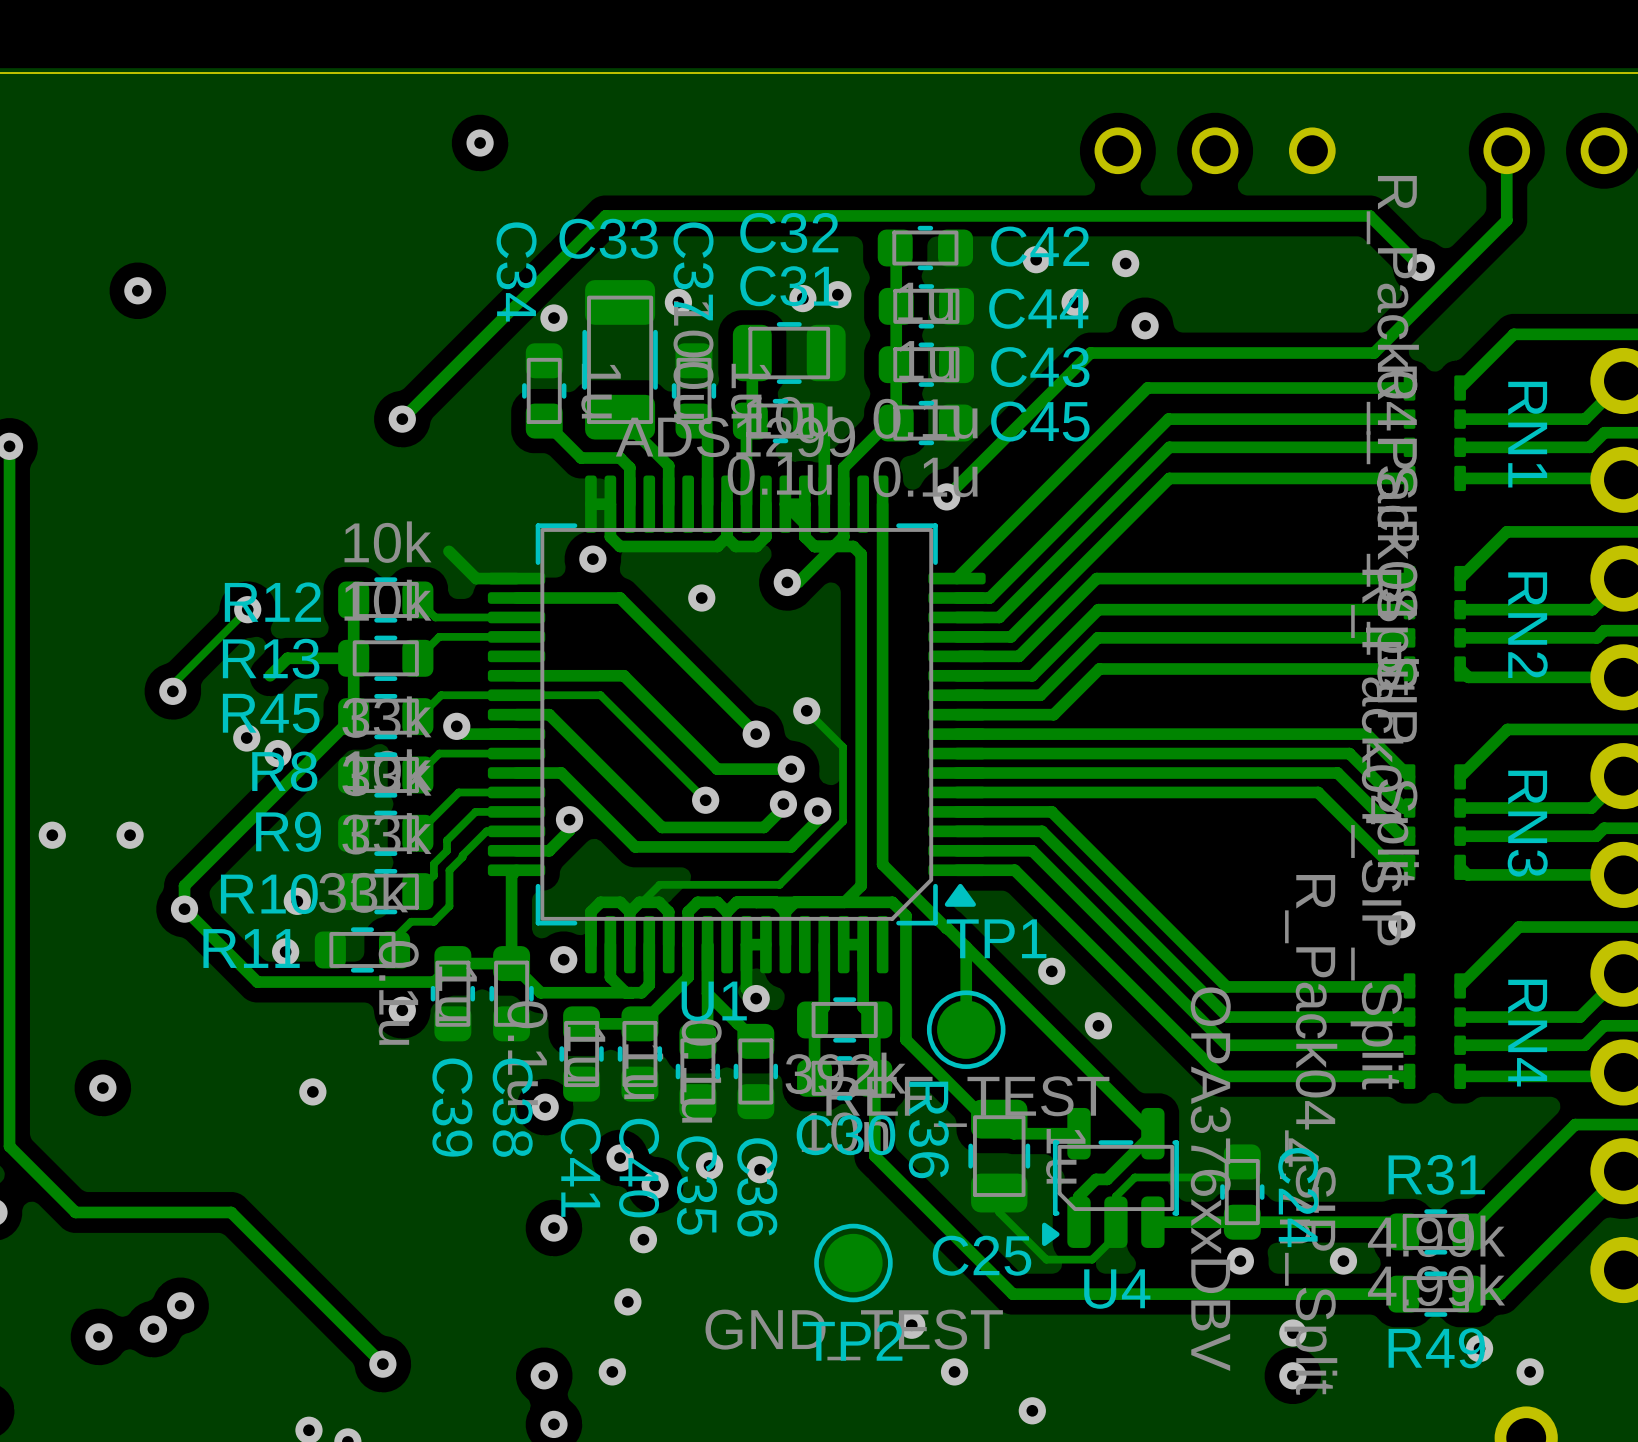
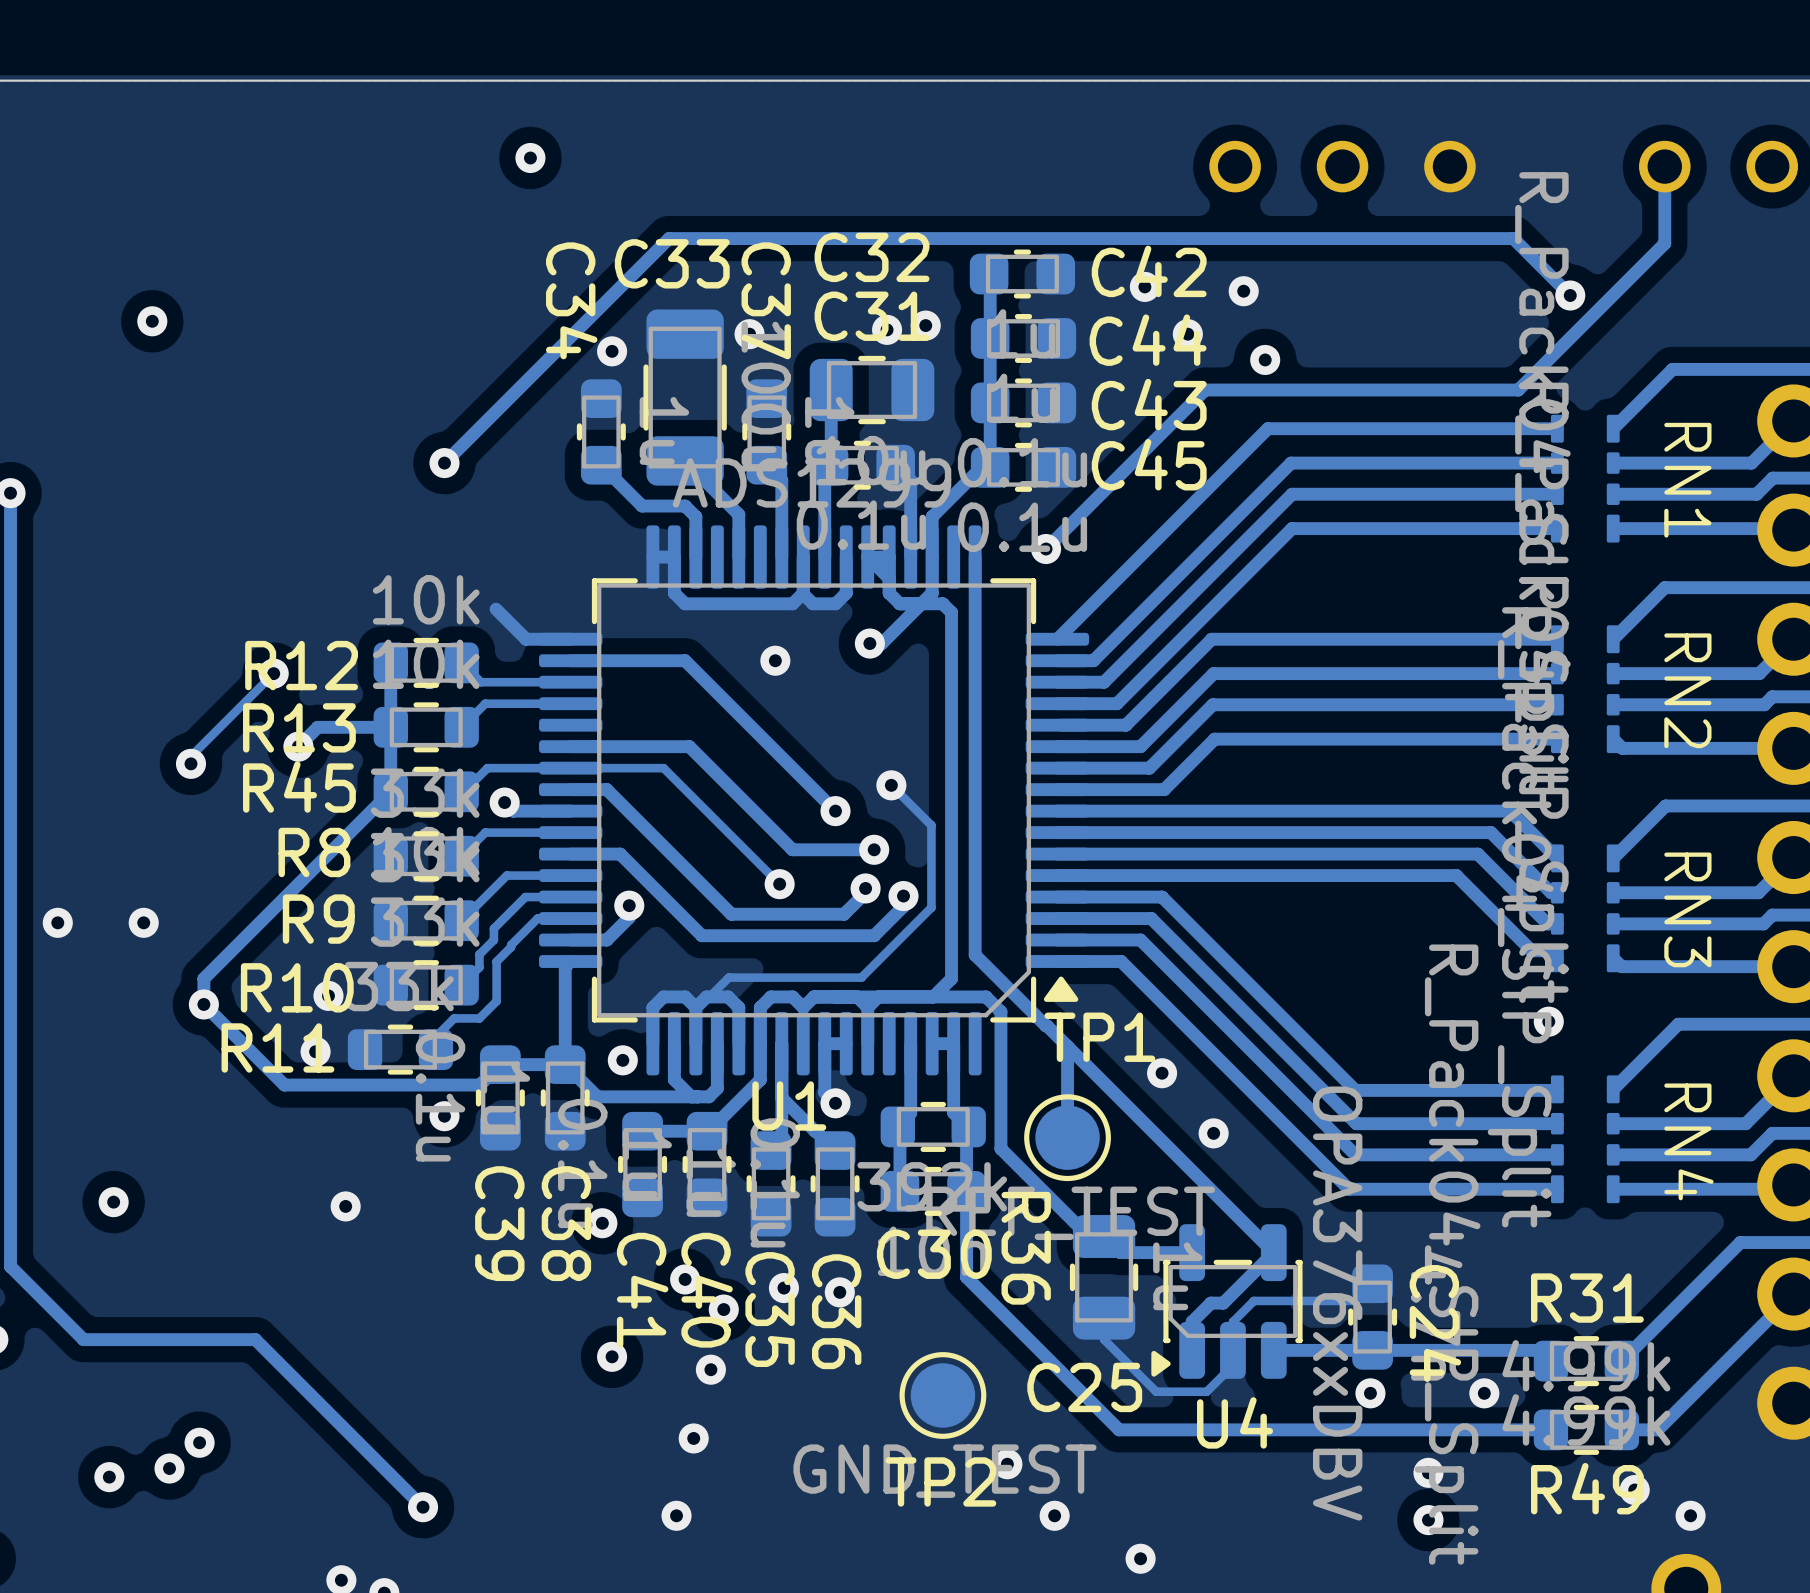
via: (592, 559) -> none
via: none -> (298, 746)
via: (246, 738) -> none
via: (277, 753) -> none
via: (544, 1375) -> none
via: (553, 1424) -> none

